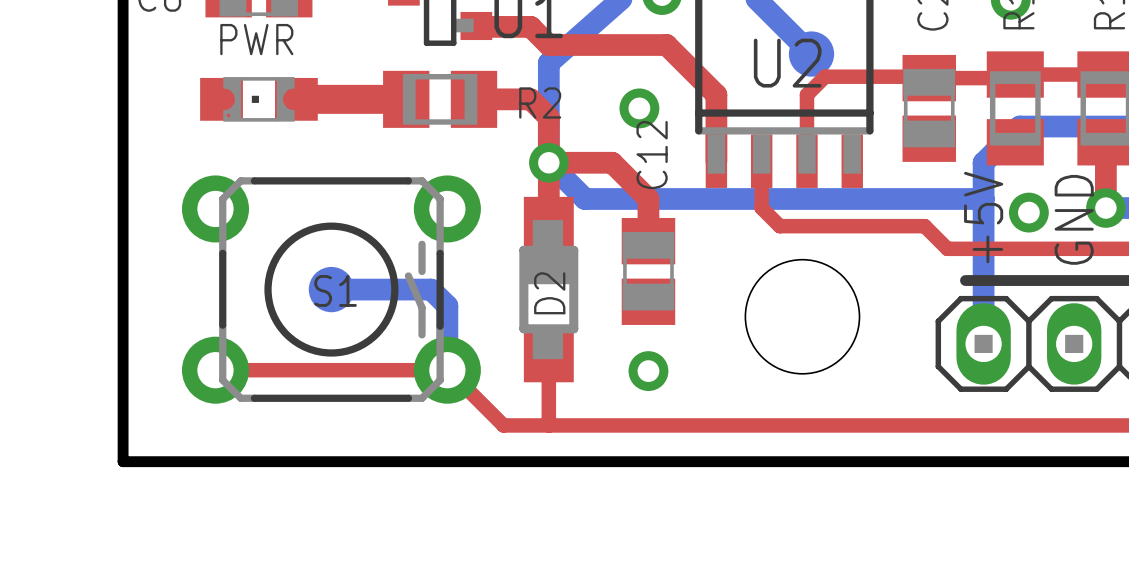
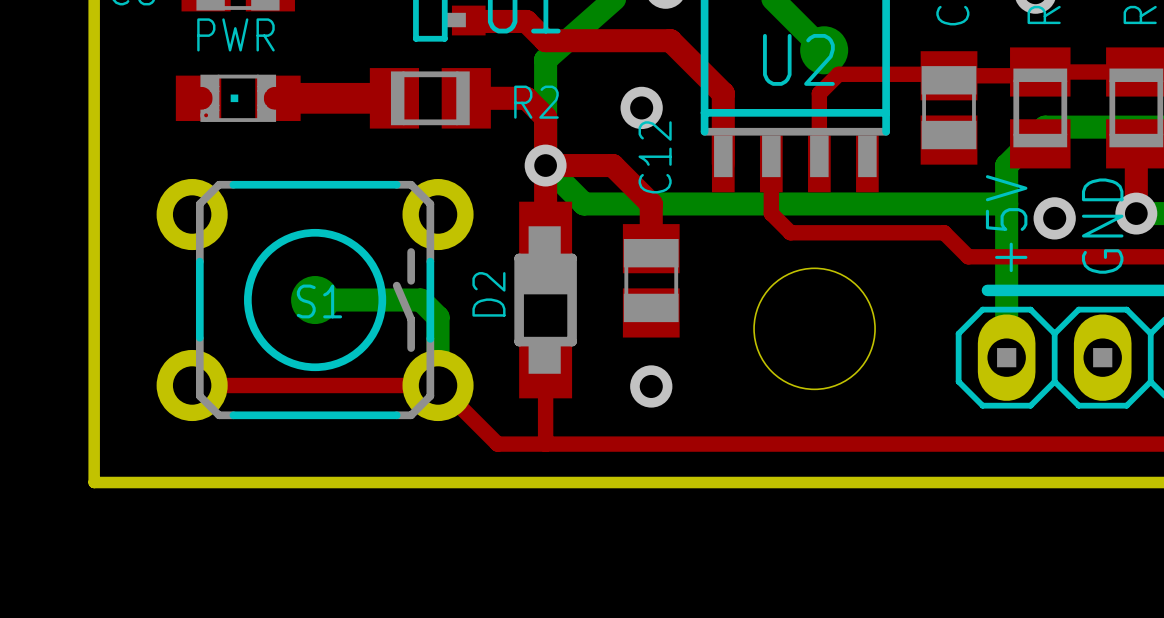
D2 name position: D2 (549, 293) -> D2 (488, 294)

